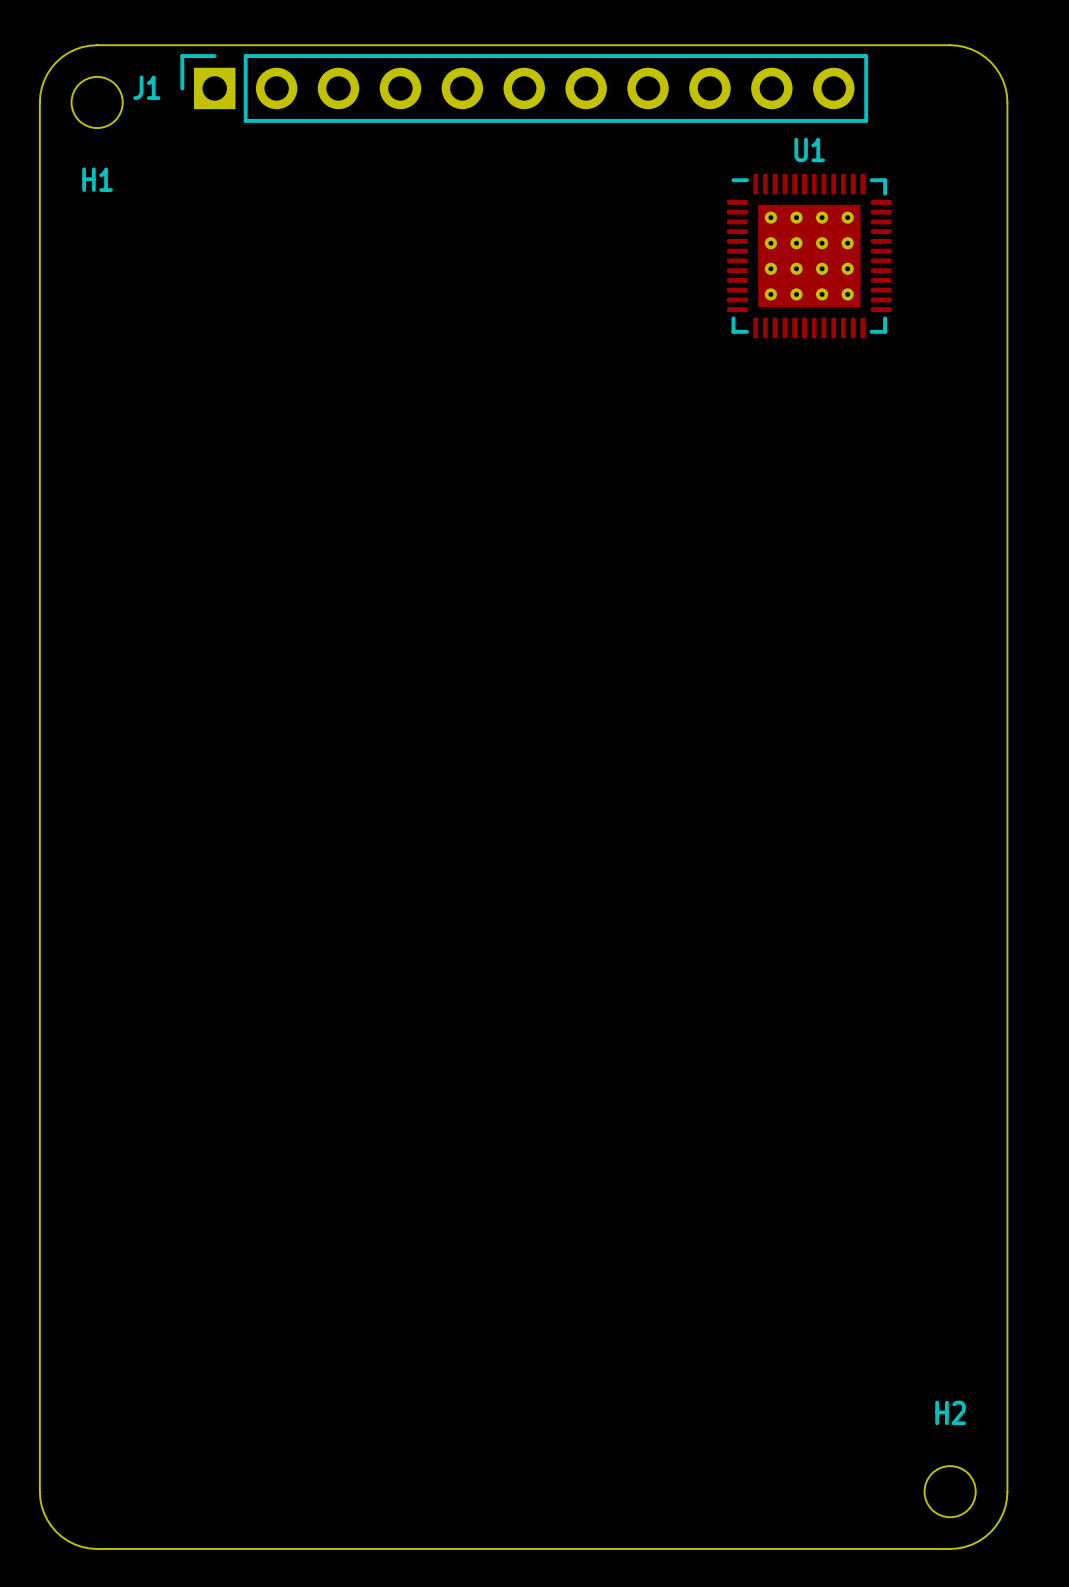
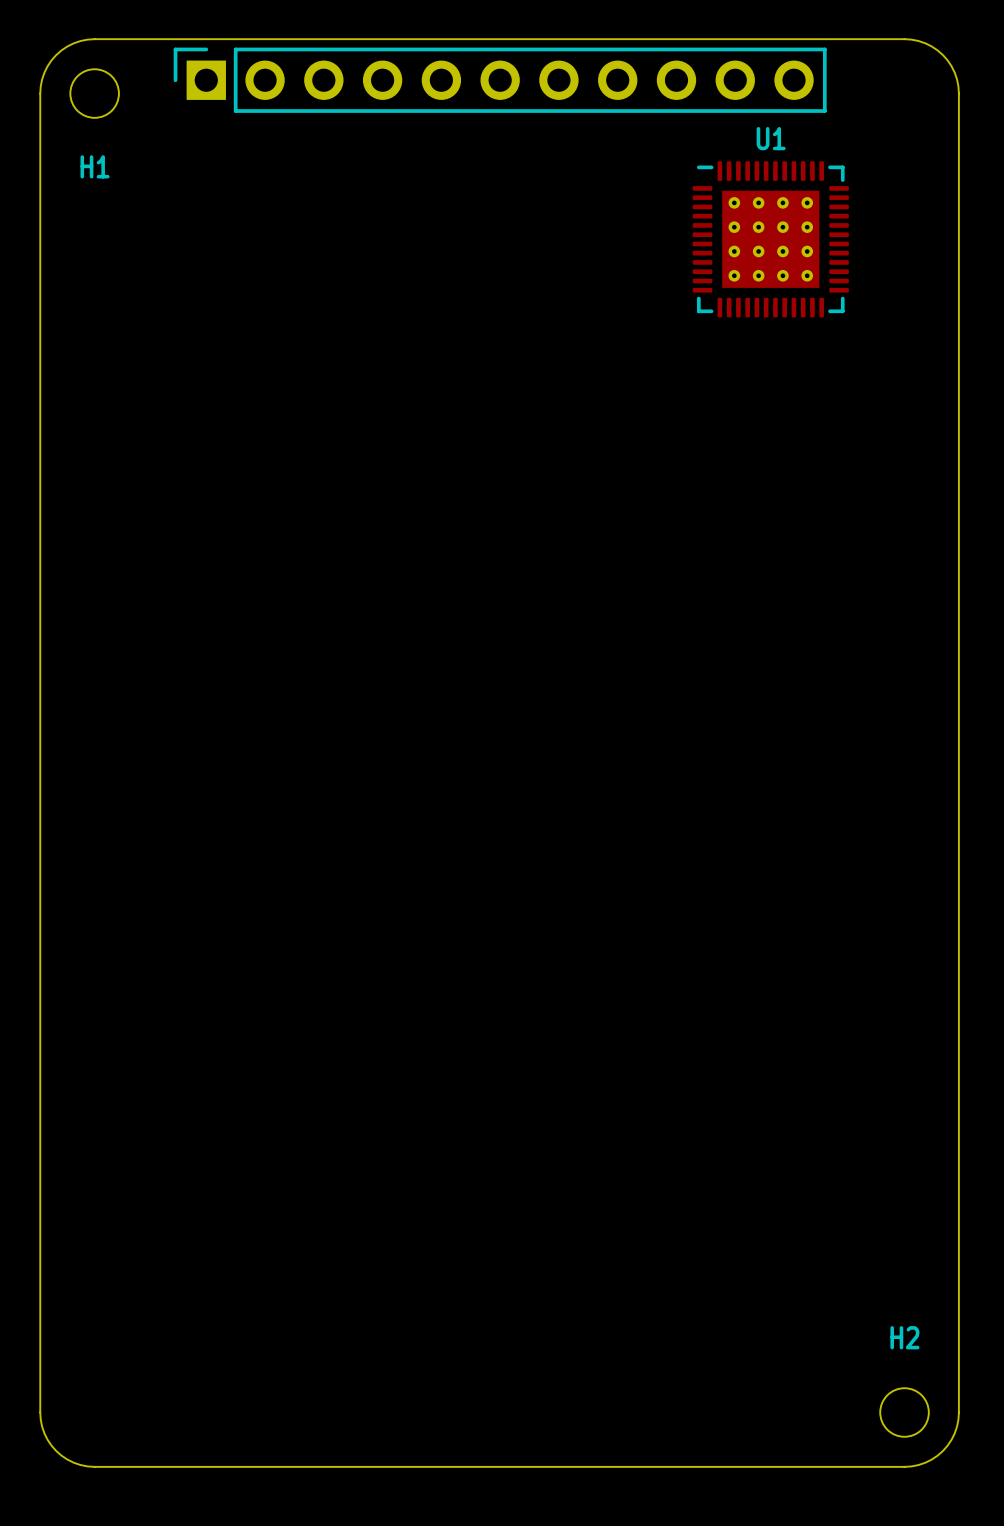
J1 name: J1 (146, 87) -> none

